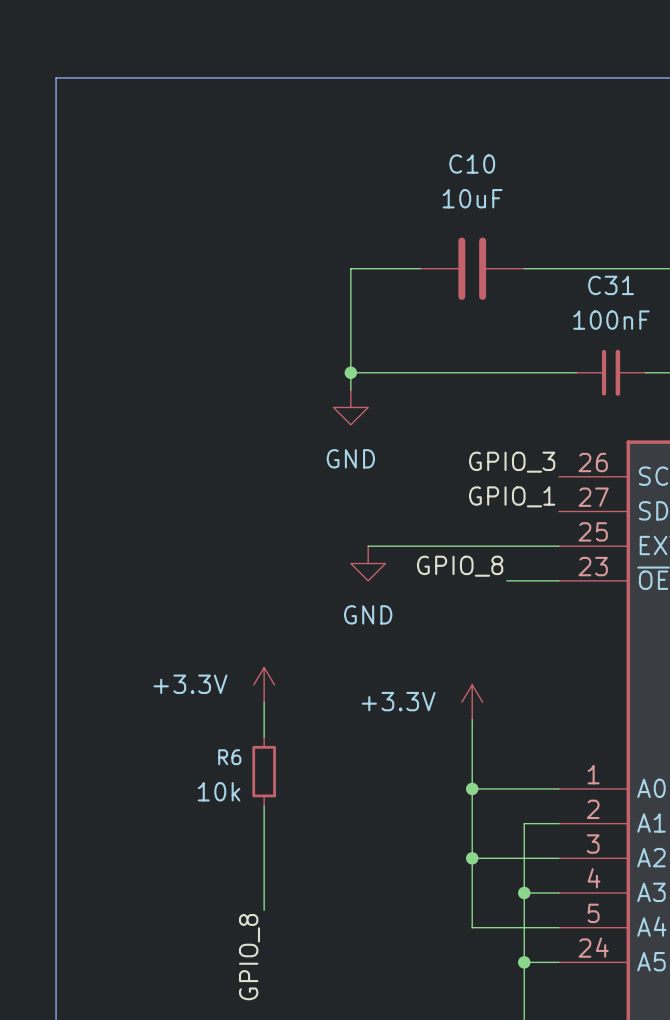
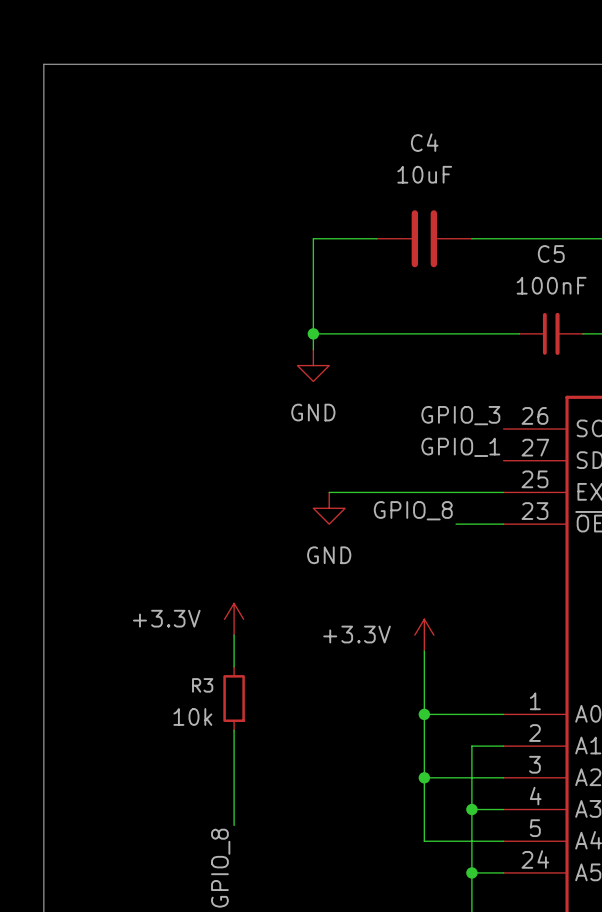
C10 name: C10 (472, 164) -> C4 (424, 142)
C31 name: C31 (611, 285) -> C5 (551, 254)
R6 name: R6 (229, 757) -> R3 (202, 685)

